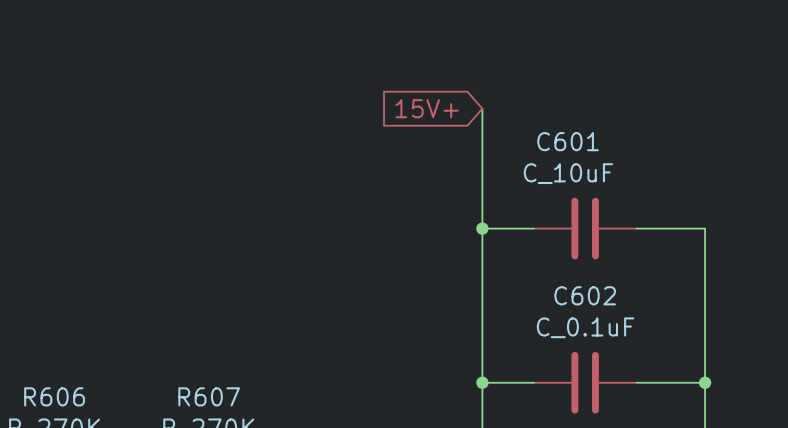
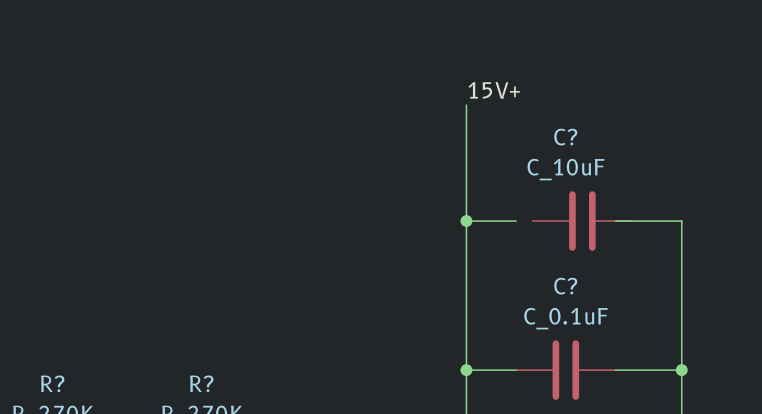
label: none -> 15V+ (494, 90)
global label: 15V+ (427, 108) -> none
C601: C_10uF (585, 228) -> none
C?: none -> C_10uF (582, 221)
C602 name: C602 (585, 295) -> C? (565, 286)
R606 name: R606 (54, 396) -> R? (52, 383)
R607 name: R607 (209, 396) -> R? (201, 383)

